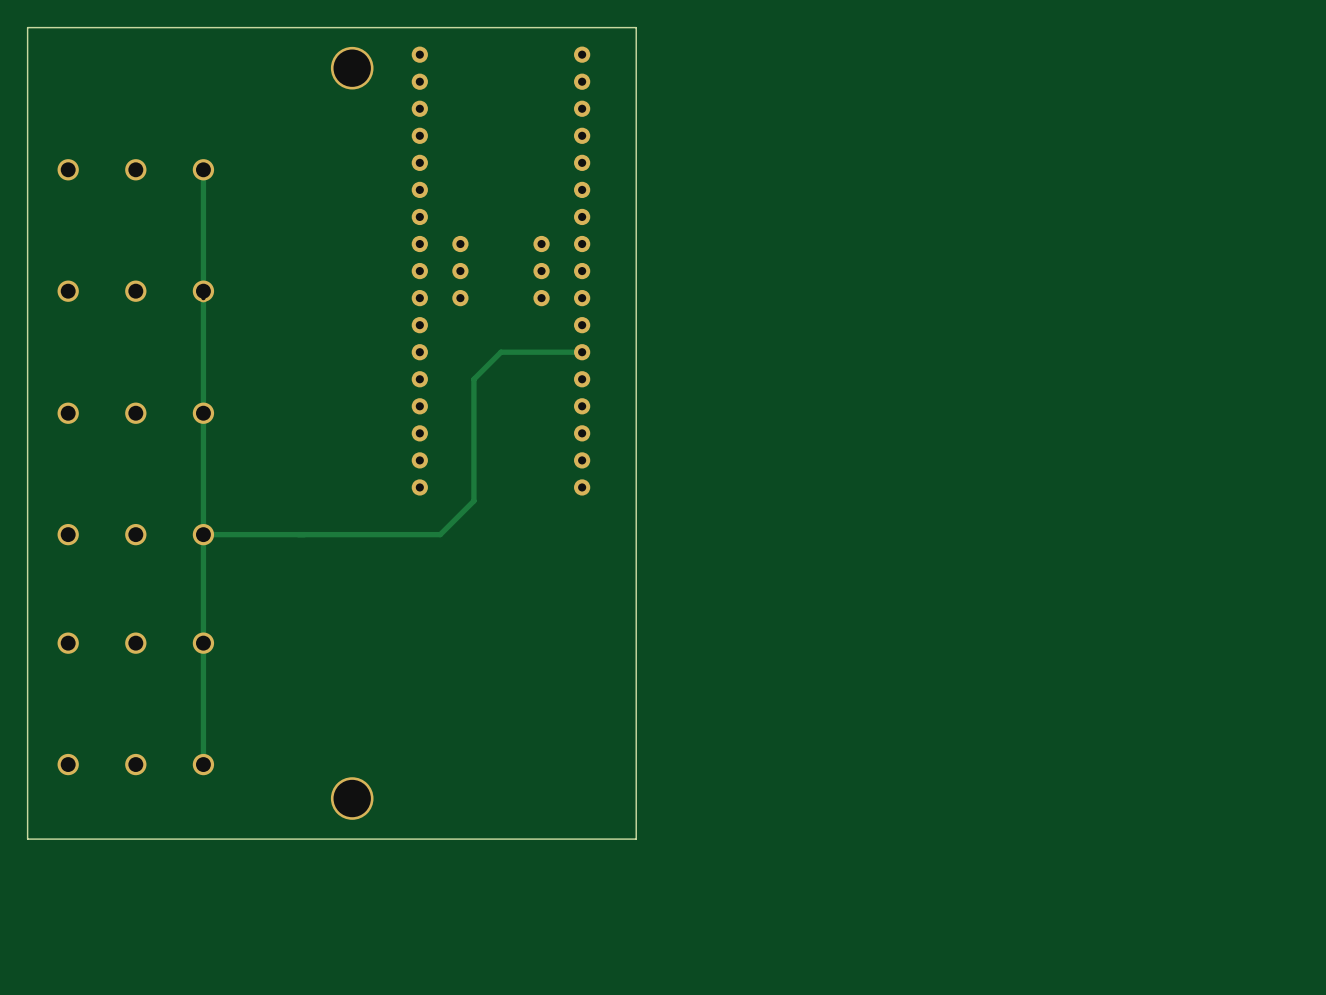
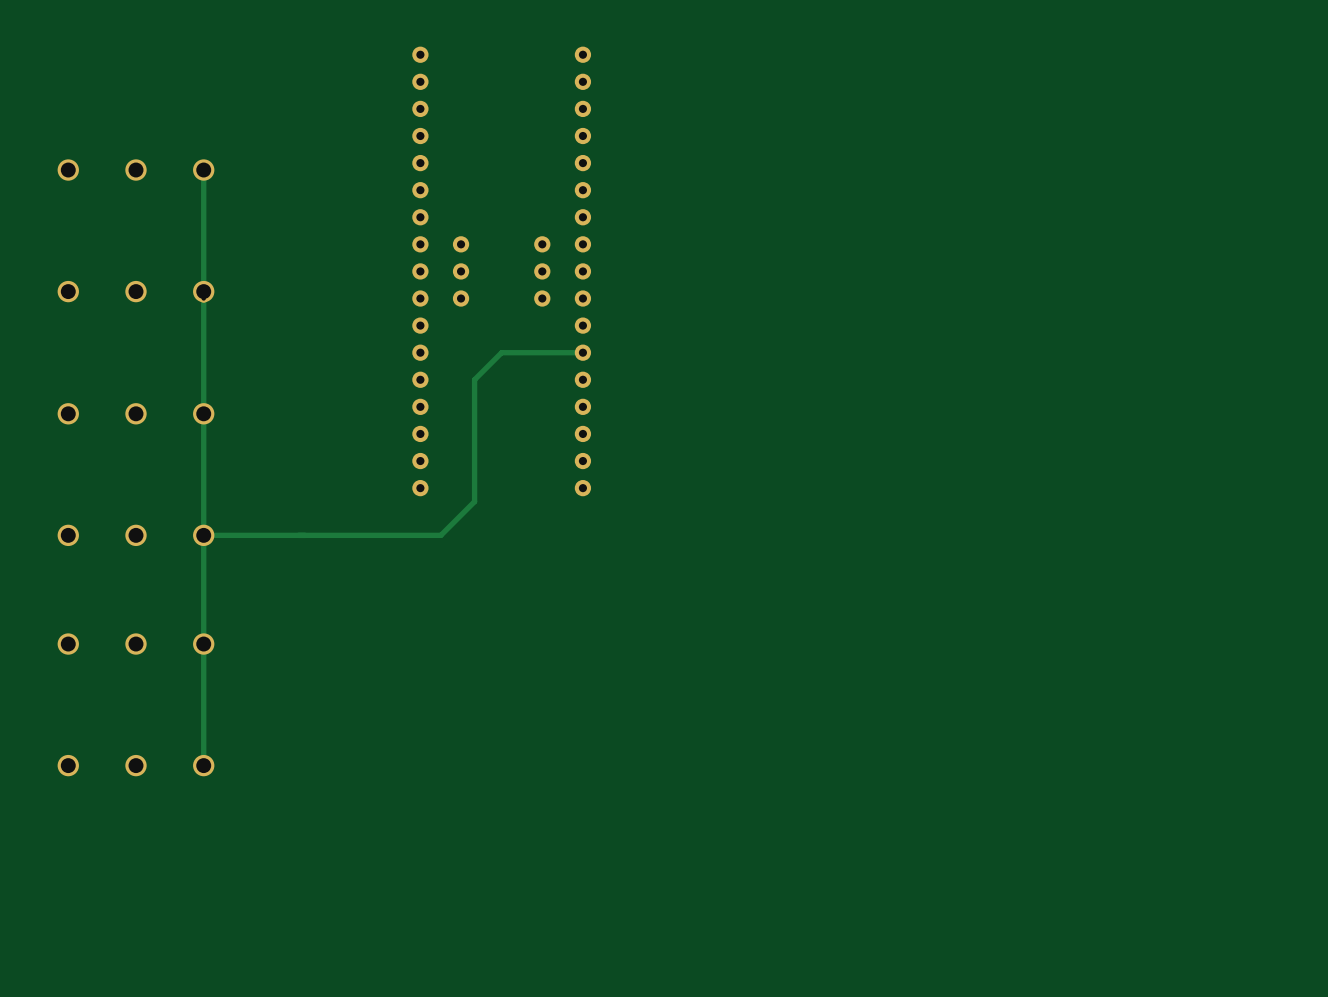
board edge: (636, 27) (636, 839) (27, 839) (27, 27) (636, 27) -> none
part: (352, 68) -> none
part: (352, 798) -> none

